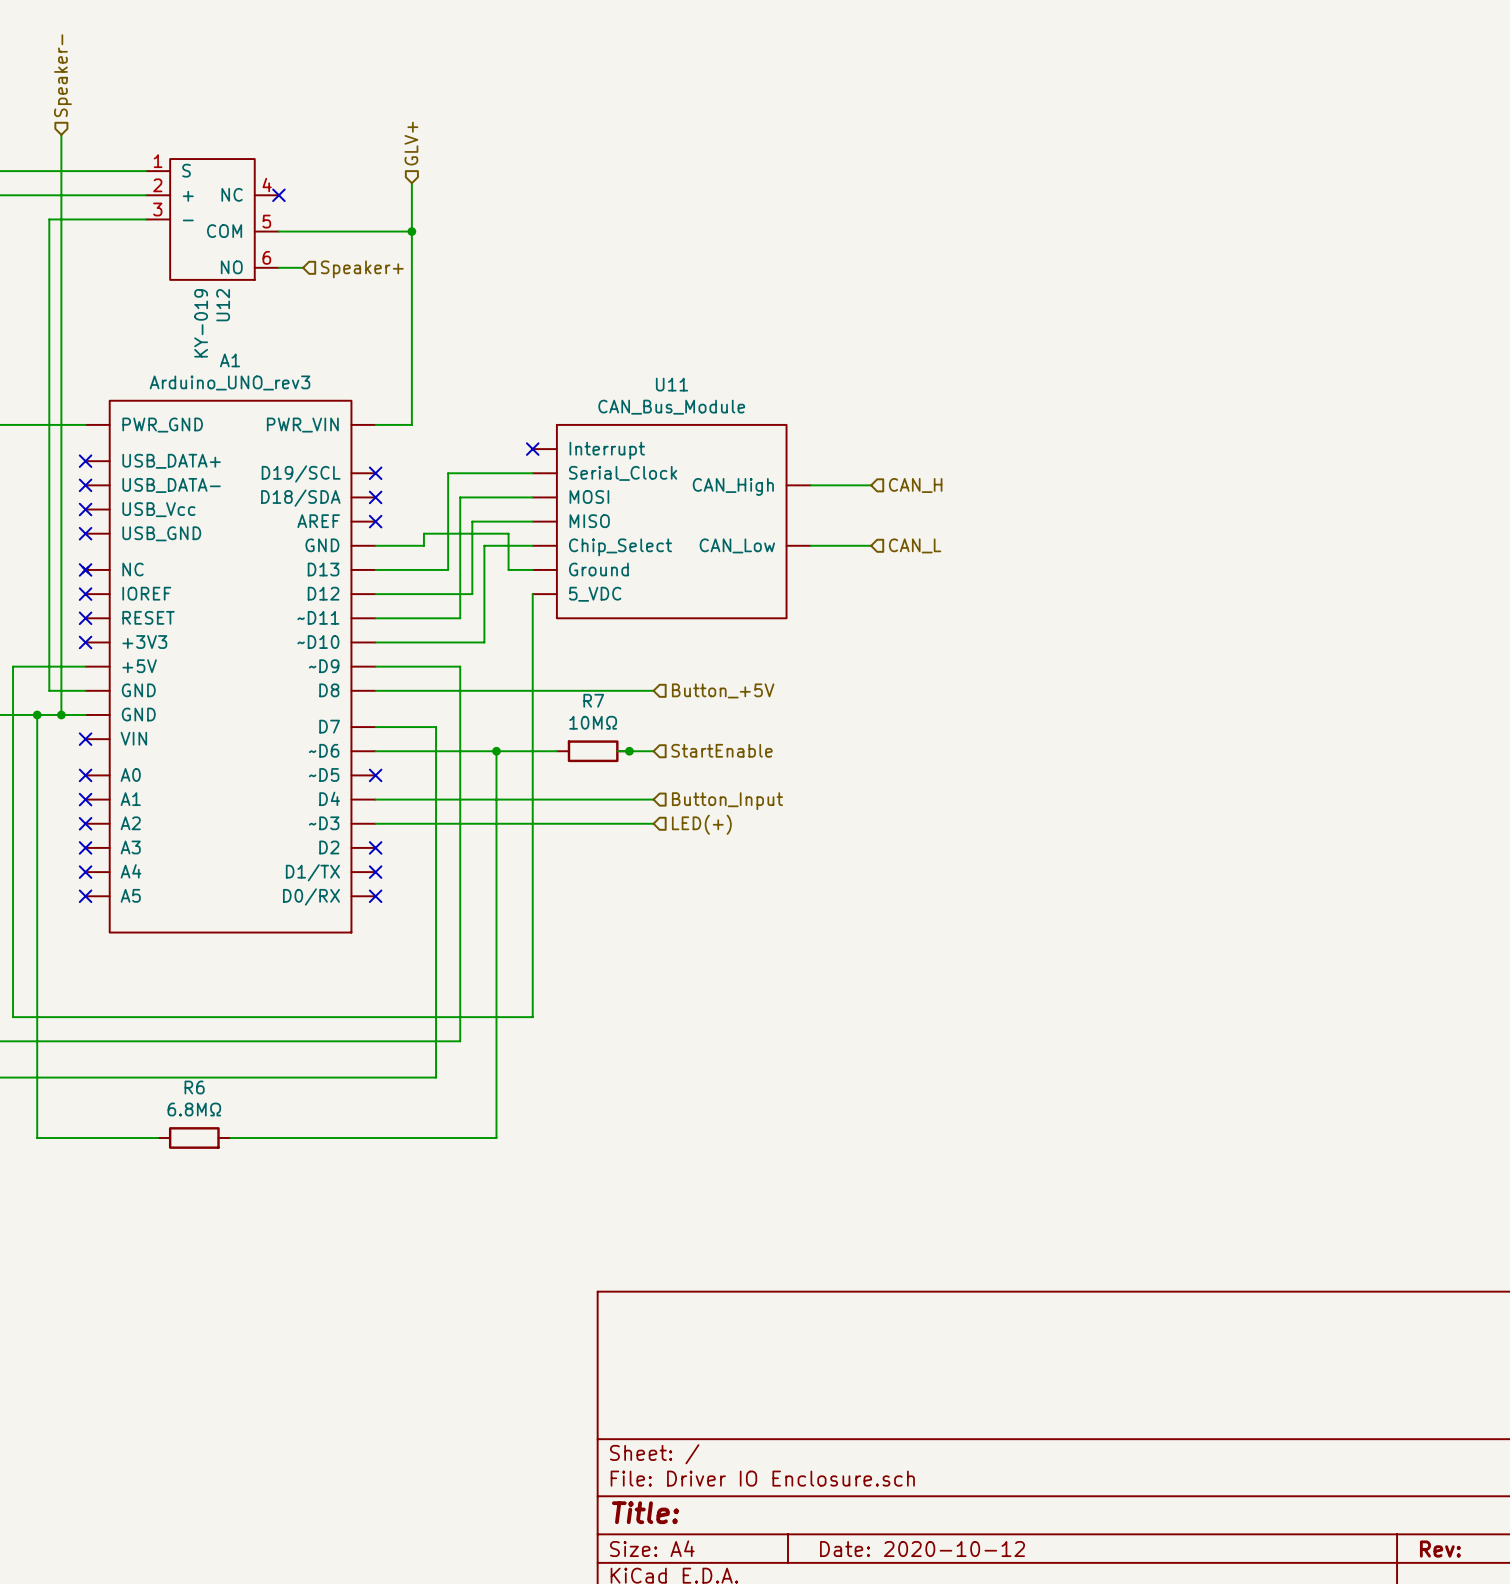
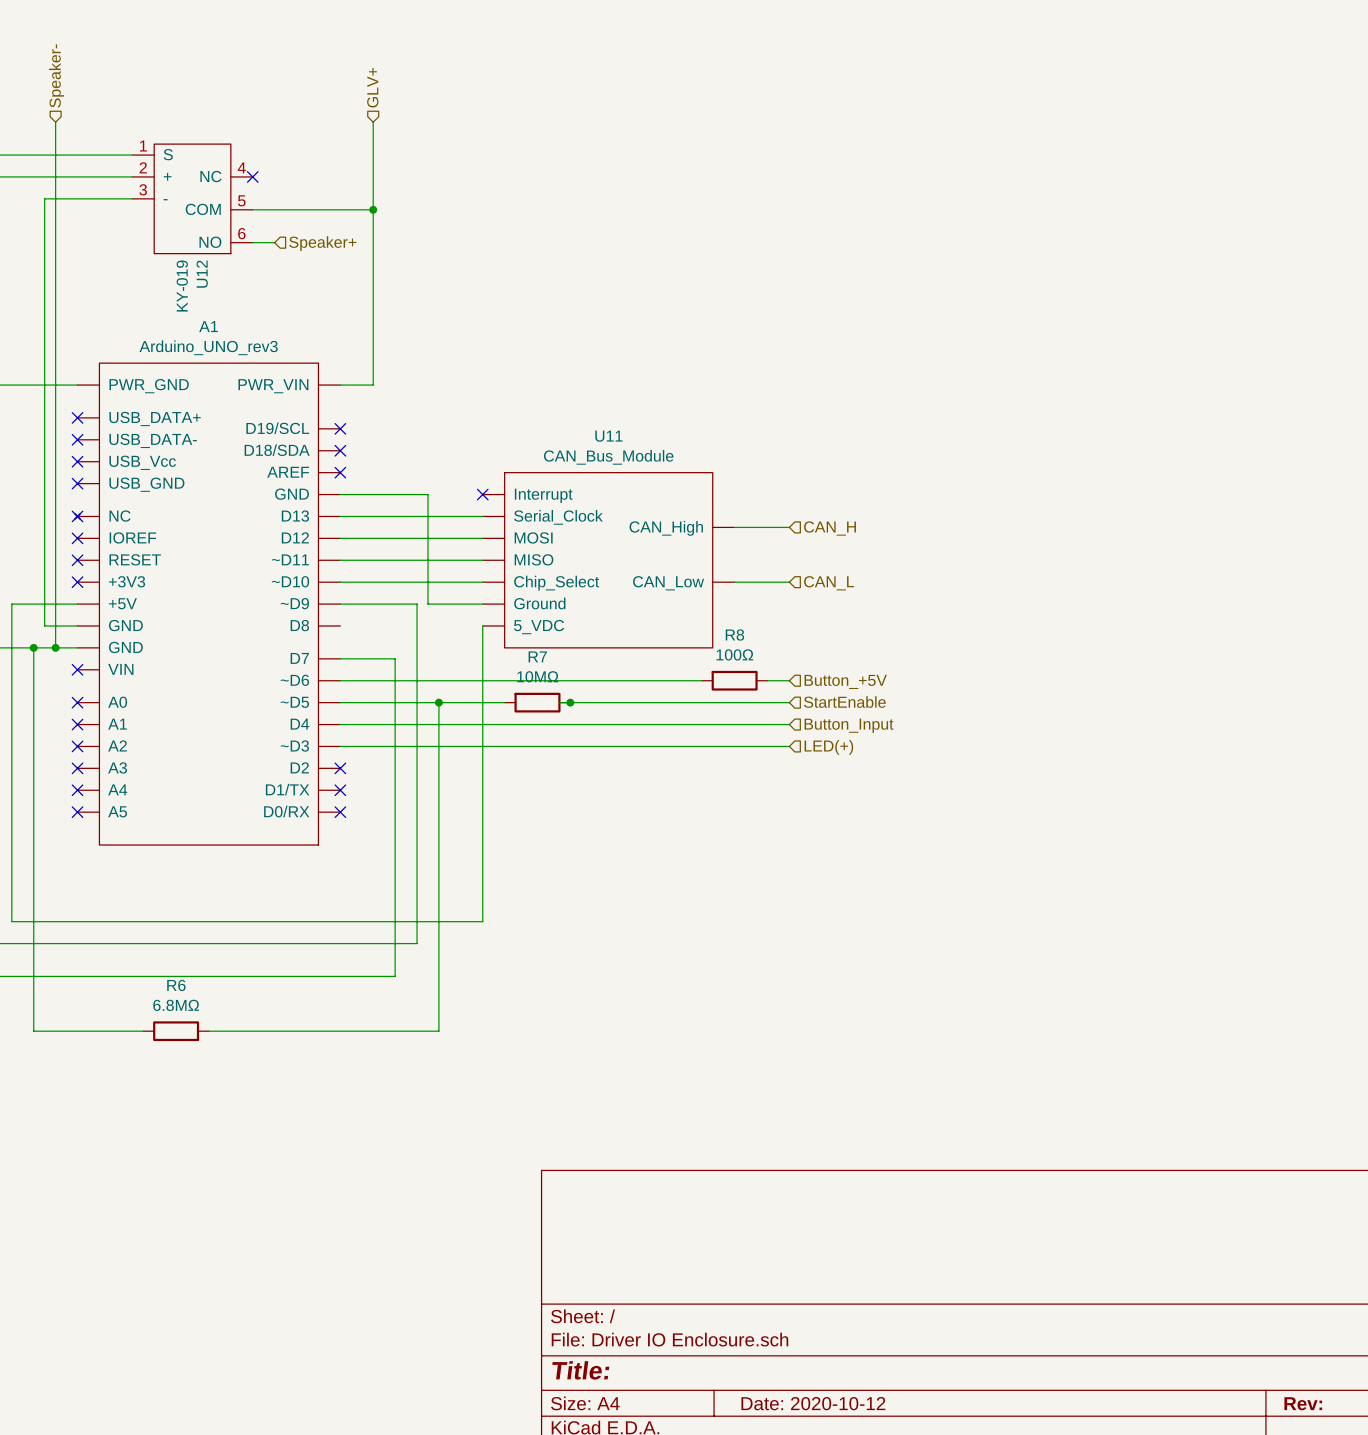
wire: none -> (373, 122) (373, 166)
hierarchical label position: GLV+ (411, 143) -> GLV+ (372, 87)
no-connect mark: (532, 449) -> none
wire: (532, 473) (448, 473) (448, 569) -> none
wire: (810, 485) (871, 485) -> (734, 527) (789, 527)
hierarchical label position: CAN_H (915, 485) -> CAN_H (830, 528)
wire: (532, 497) (460, 497) (460, 618) -> (482, 560) (417, 560)
wire: (532, 521) (472, 521) (472, 545) -> (384, 494) (427, 494)
U11 position: (671, 521) -> (608, 560)
wire: (423, 545) (423, 533) (508, 533) (508, 569) -> (406, 516) (460, 516)
wire: (532, 545) (484, 545) (484, 642) -> (482, 582) (438, 582)
no-connect mark: none -> (482, 494)
wire: (810, 545) (871, 545) -> (734, 582) (789, 582)
hierarchical label position: CAN_L (915, 545) -> CAN_L (829, 583)
wire: (532, 594) (532, 690) -> (482, 538) (427, 538) (427, 604) (482, 604)
wire: (375, 690) (653, 690) -> none
hierarchical label position: Button_+5V (723, 690) -> Button_+5V (845, 681)
hierarchical label position: StartEnable (721, 750) -> StartEnable (844, 702)
wire: (496, 751) (496, 1137) (484, 1137) -> (438, 702) (438, 1031)
junction position: (496, 751) -> (438, 702)
wire: none -> (504, 680) (559, 680)
R7 position: (593, 751) -> (537, 702)
junction position: (629, 751) -> (570, 702)
wire: none -> (592, 680) (701, 680)
R8: none -> 100Ω (734, 680)
wire: none -> (767, 680) (789, 680)
wire: none -> (340, 702) (504, 702)
no-connect mark: (375, 775) -> none
wire: none -> (559, 702) (789, 702)
wire: none -> (592, 724) (789, 724)
hierarchical label position: Button_Input (727, 801) -> Button_Input (849, 725)
wire: none -> (592, 746) (789, 746)
hierarchical label position: LED(+) (701, 824) -> LED(+) (828, 747)

